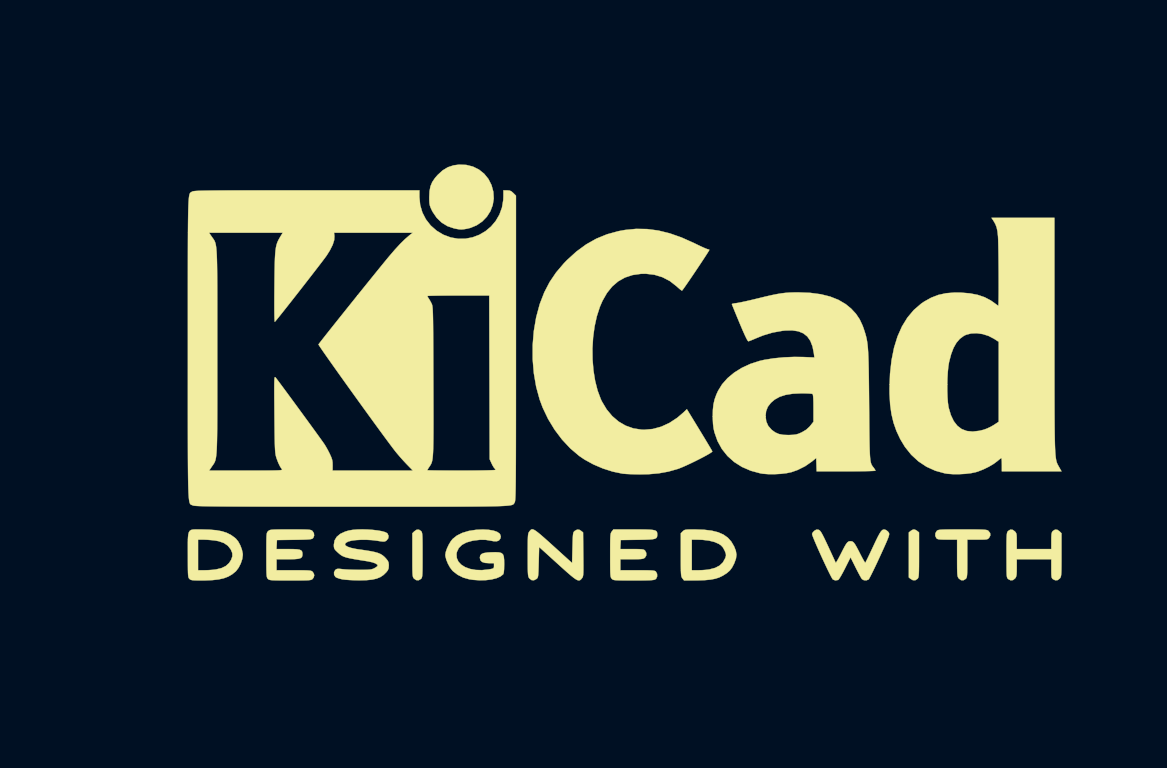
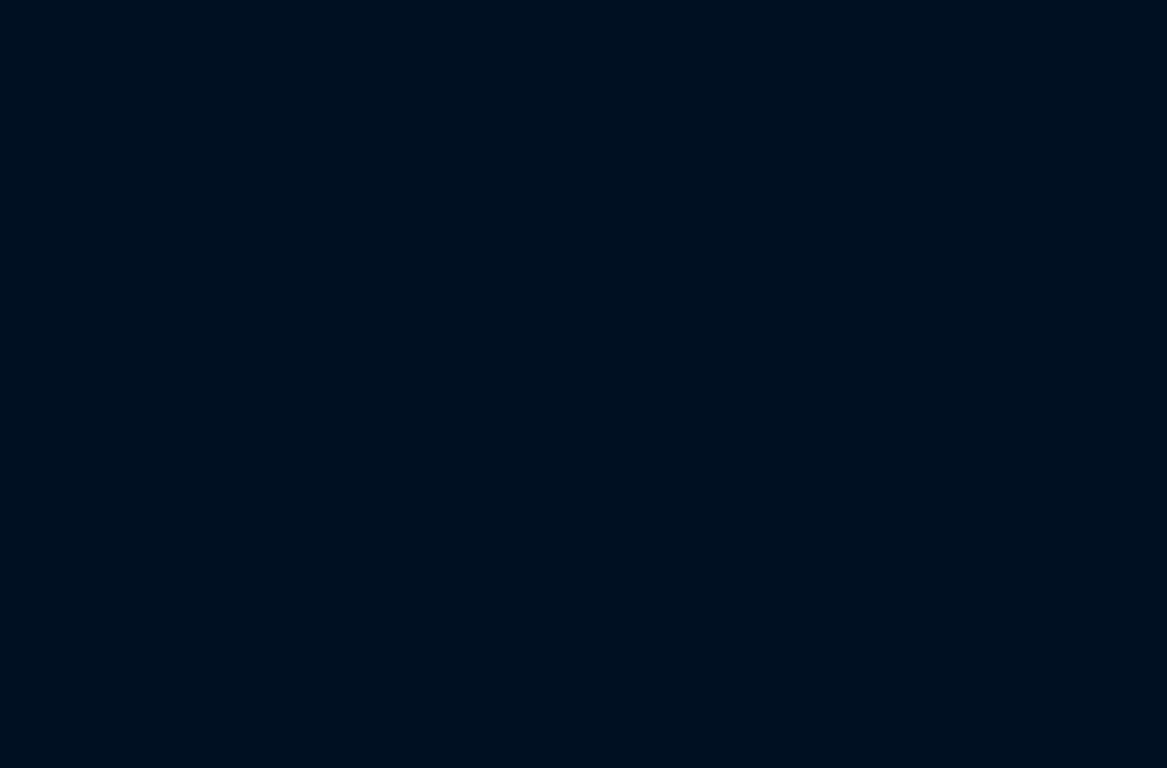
drawing: [187, 164, 1062, 581] -> none

